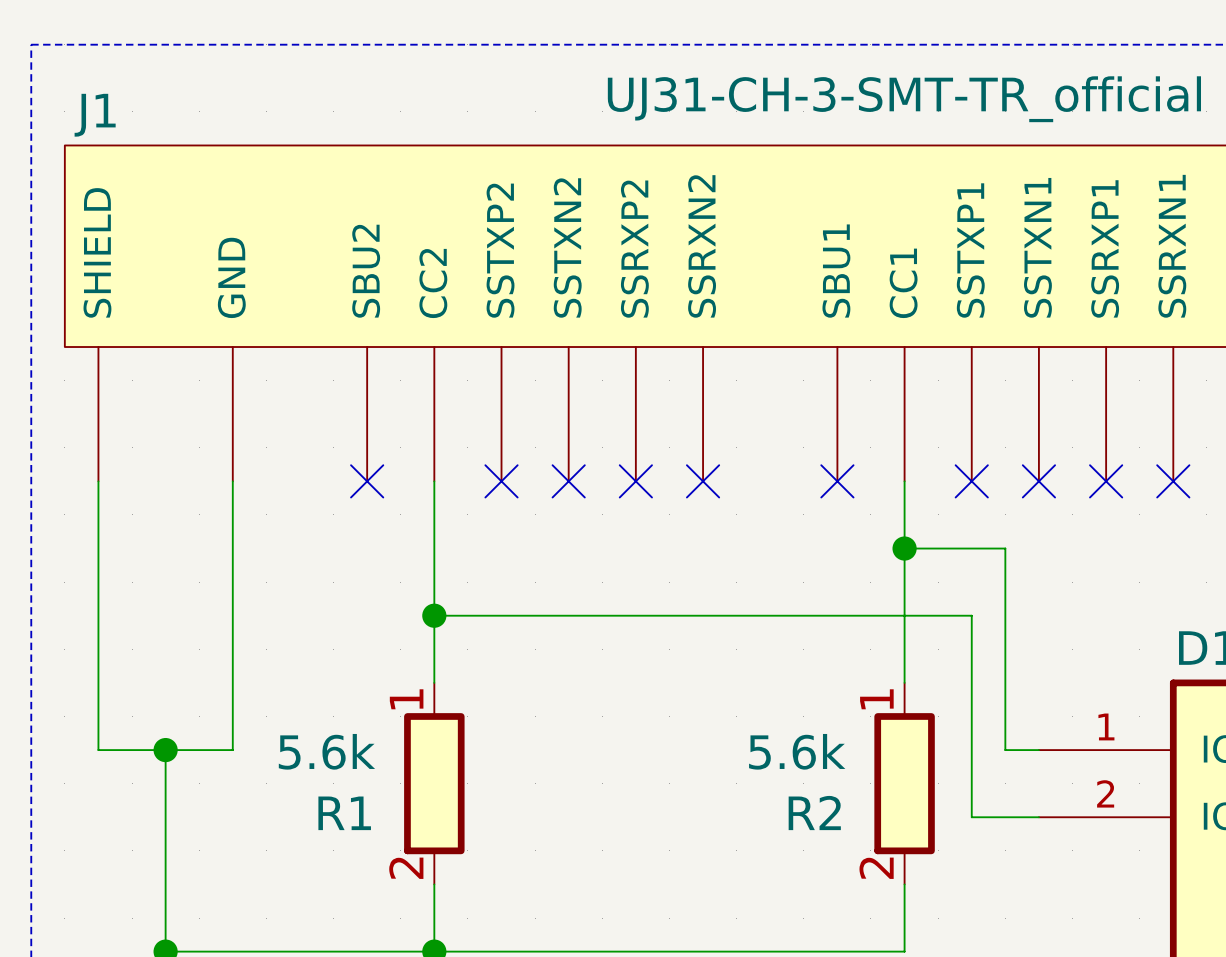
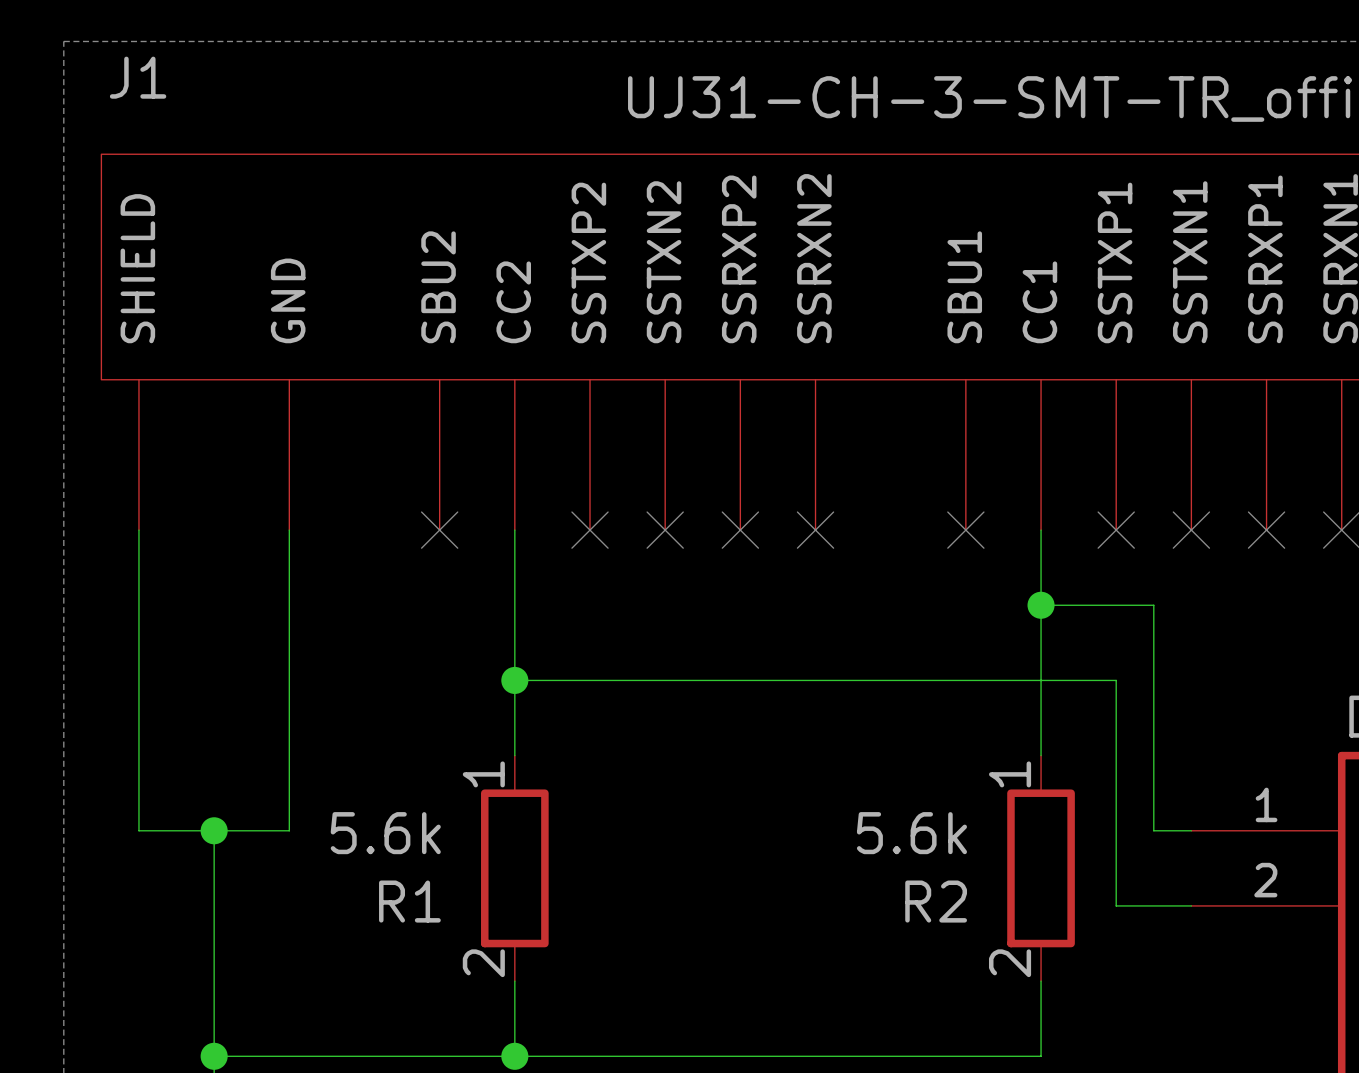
J1 name position: J1 (95, 115) -> J1 (138, 77)

